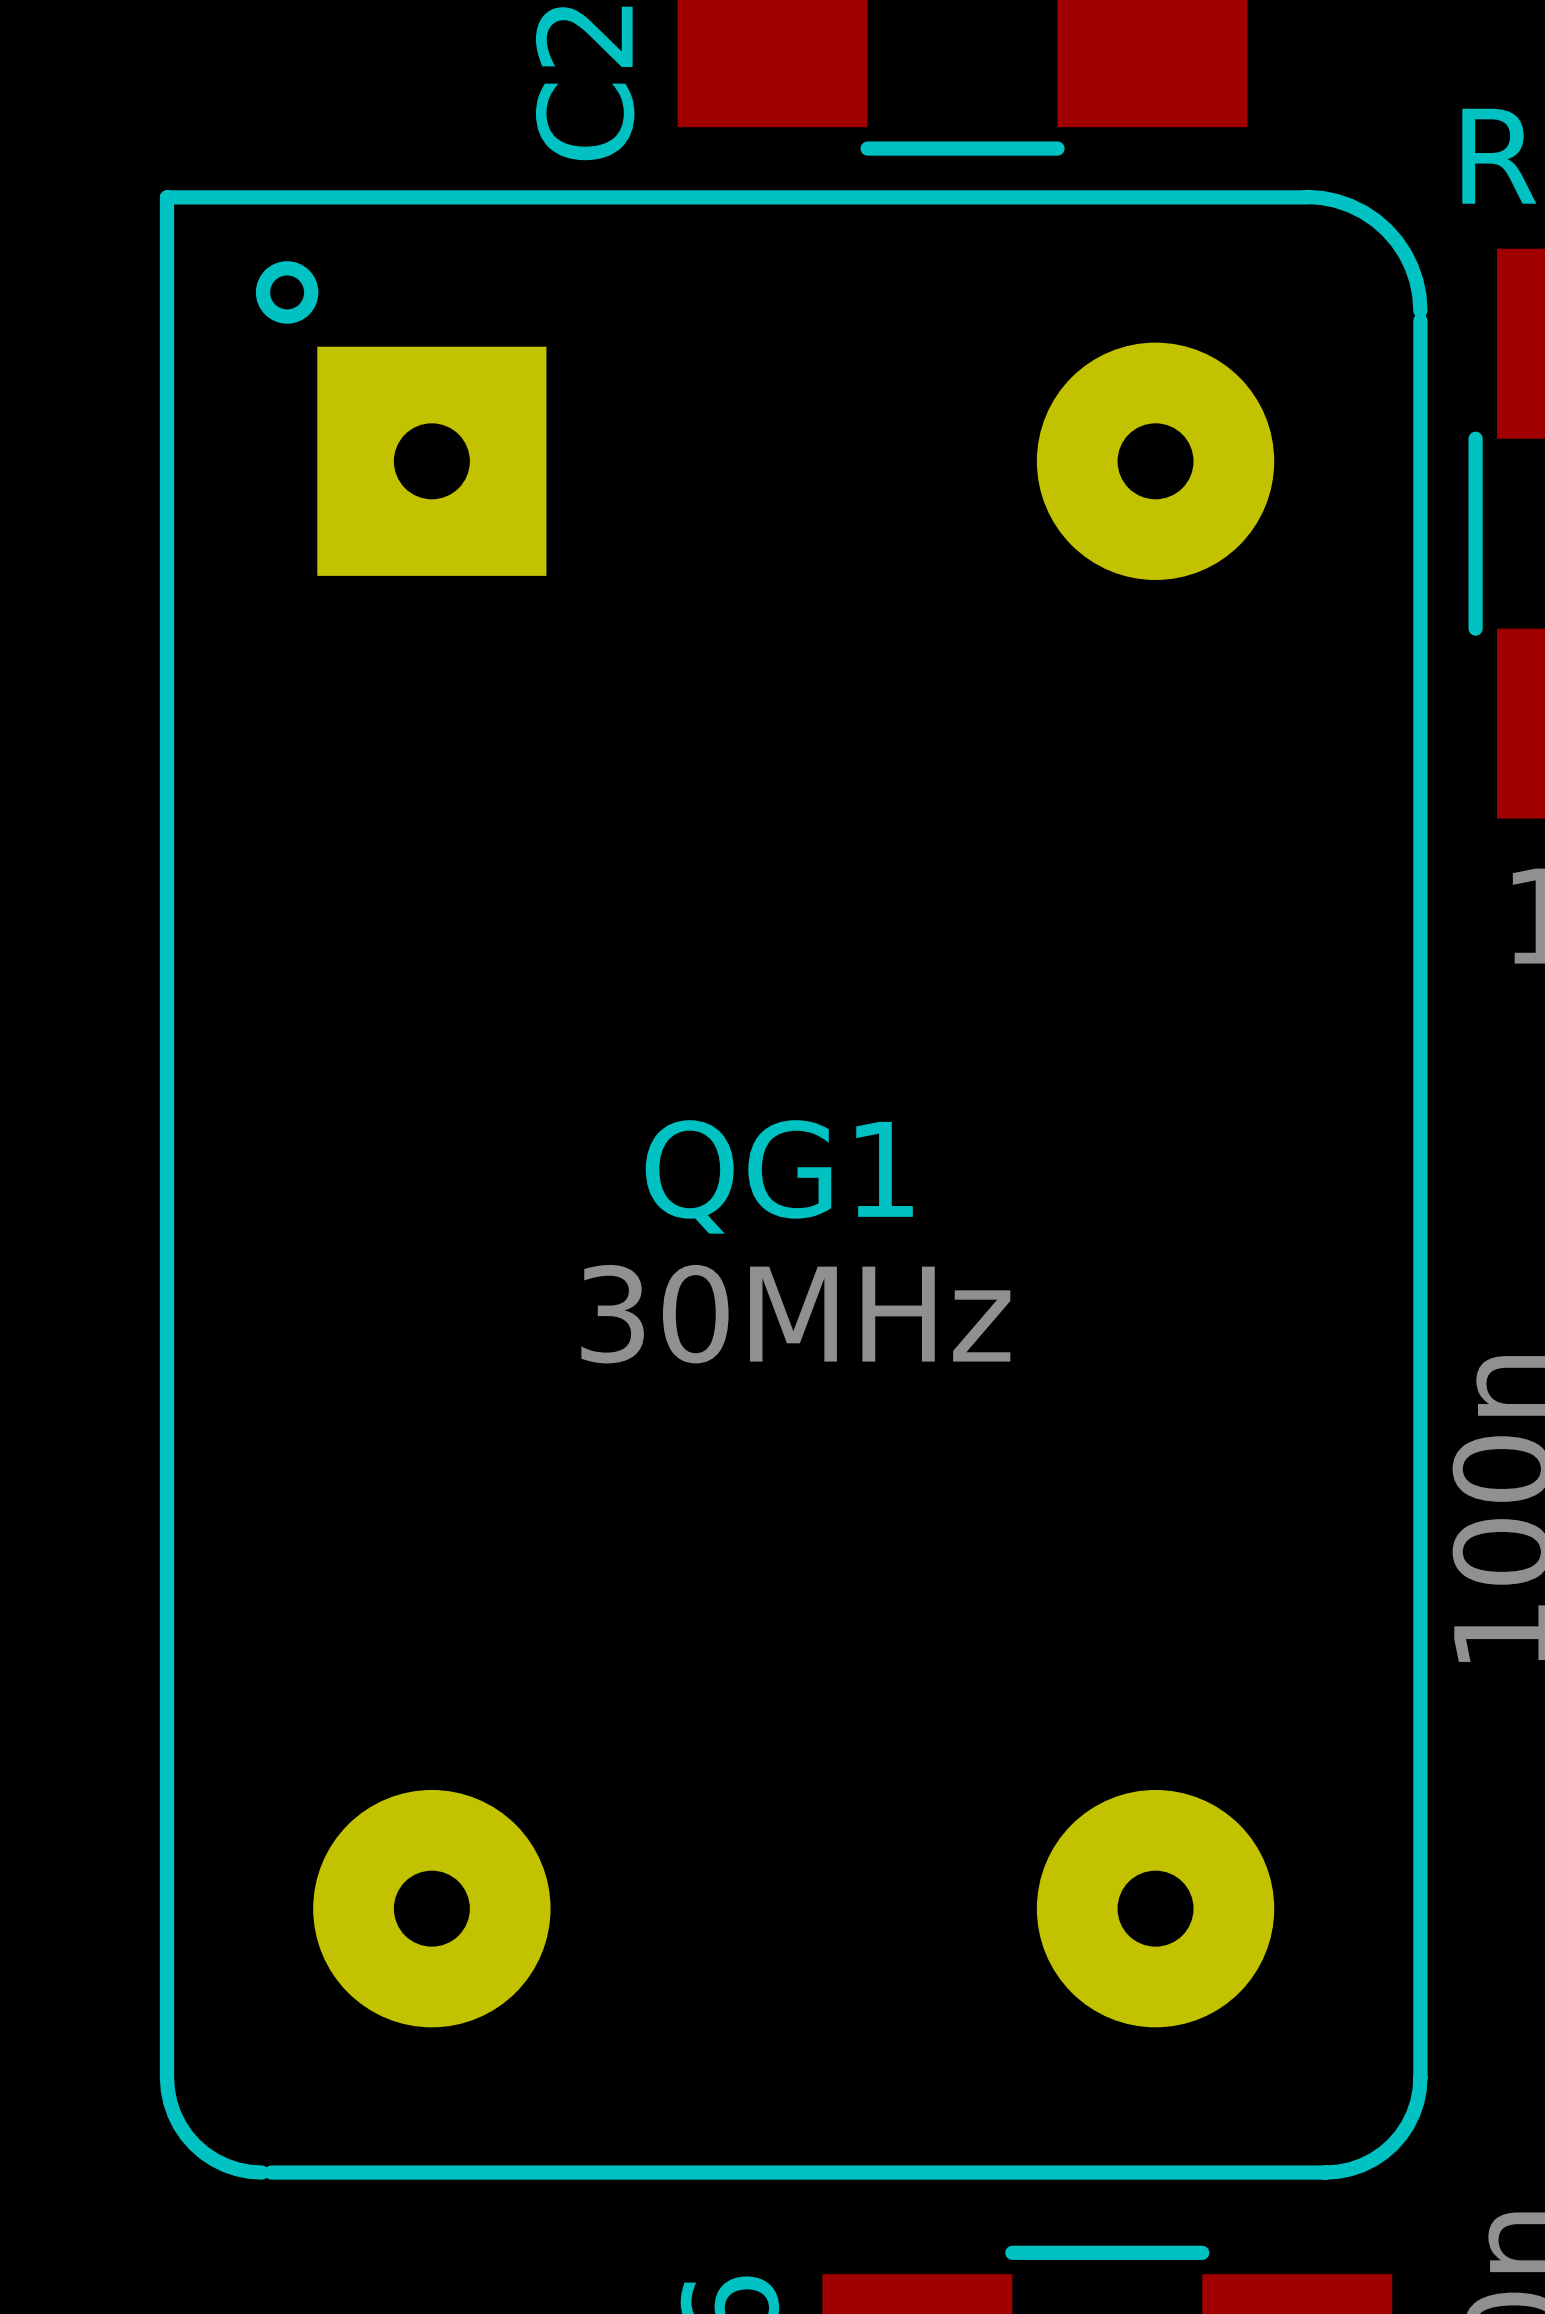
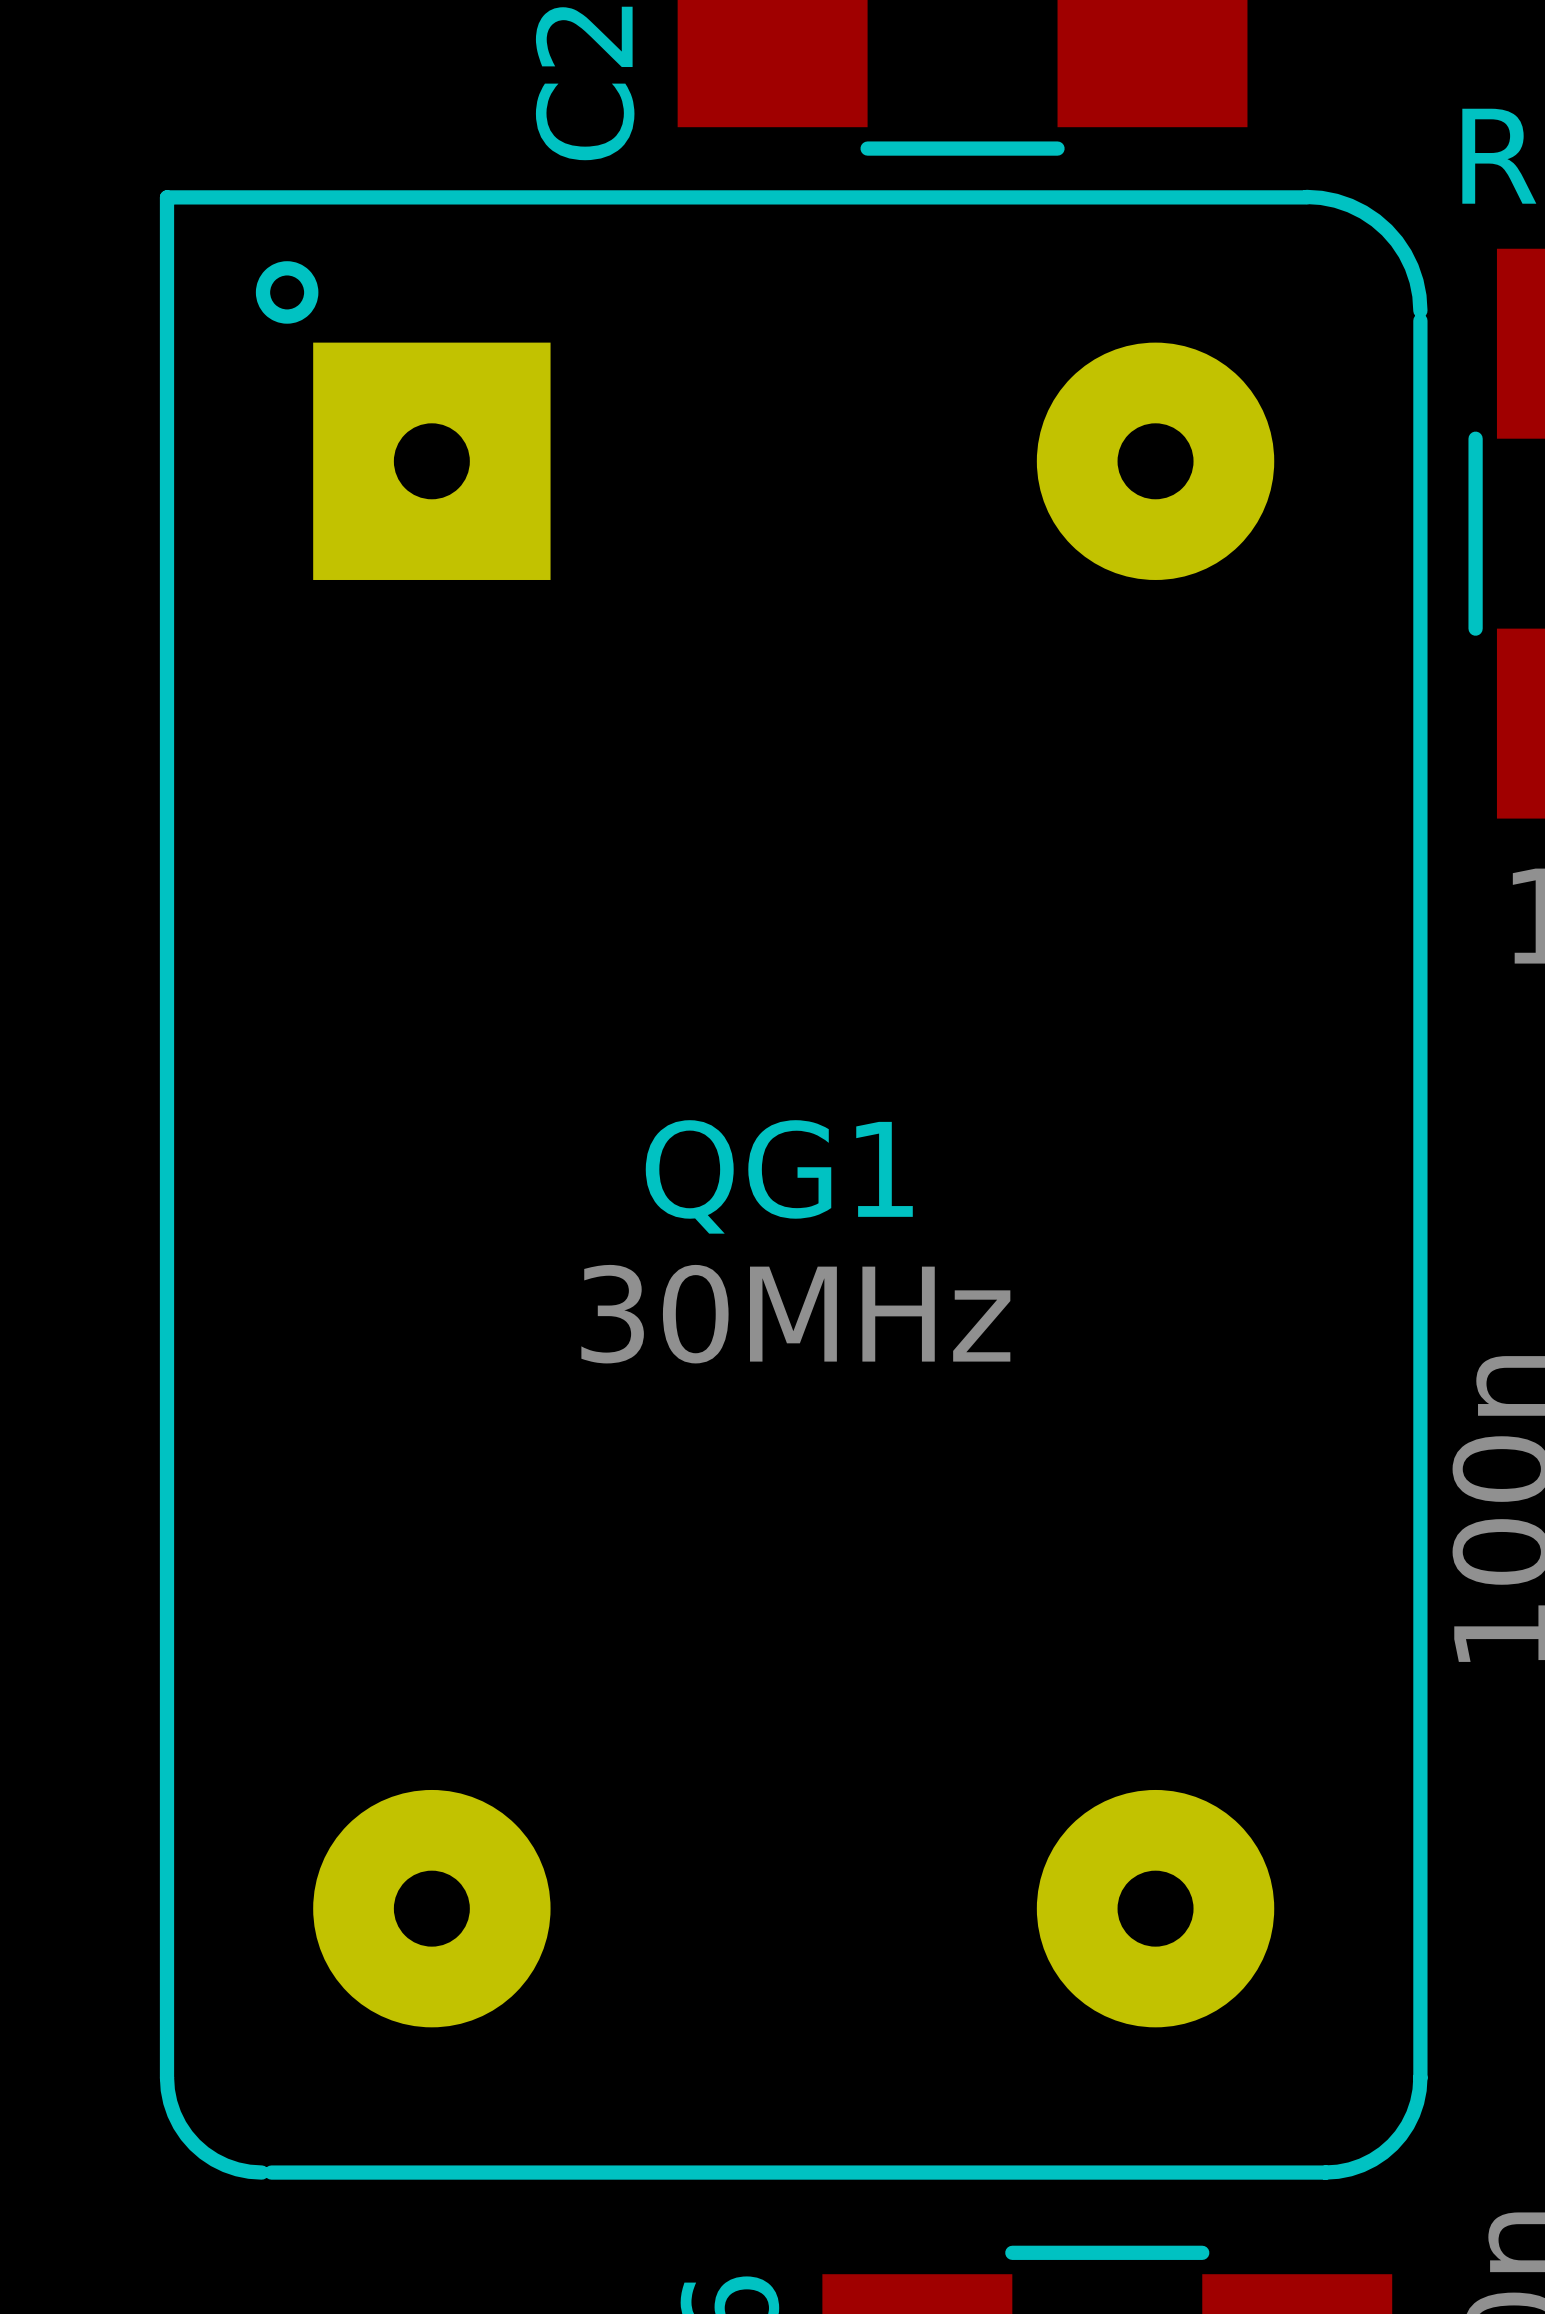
QG1 footprint: [159, 189, 1428, 2180] -> [159, 189, 1428, 2180]

